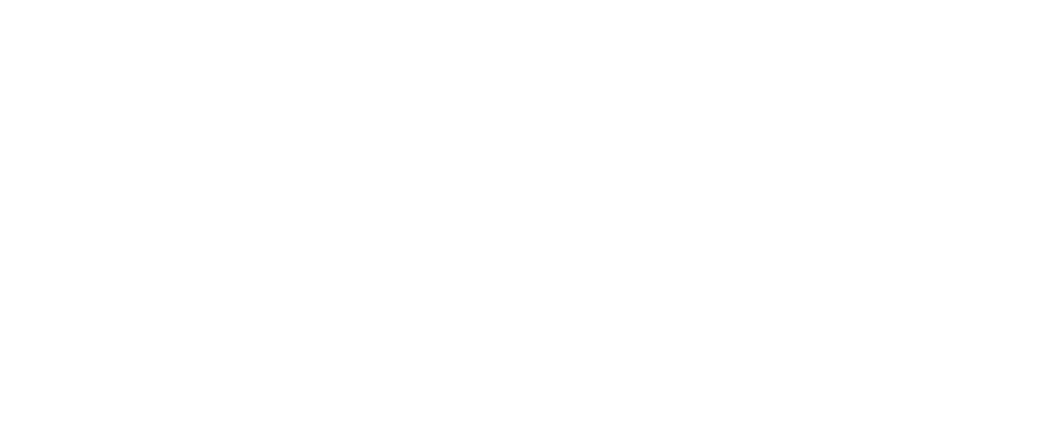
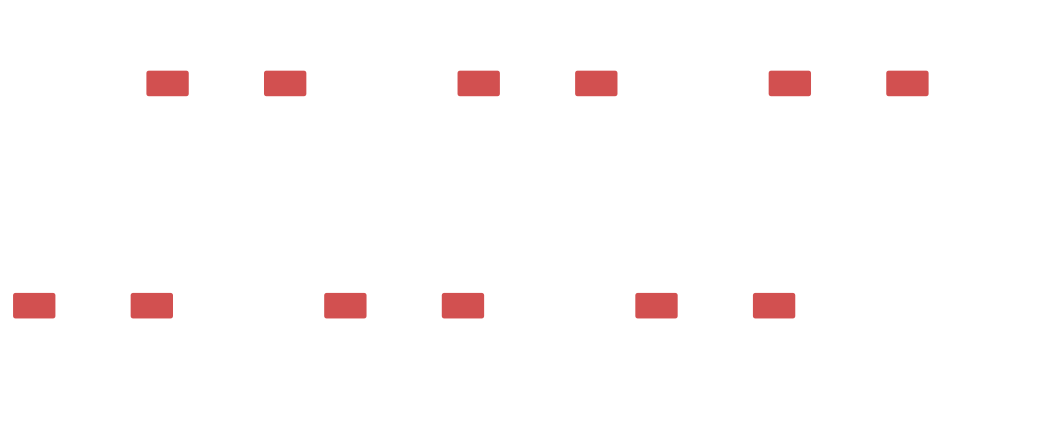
part: none -> (226, 83)
part: none -> (537, 83)
part: none -> (848, 83)
part: none -> (93, 305)
part: none -> (404, 305)
part: none -> (715, 305)

